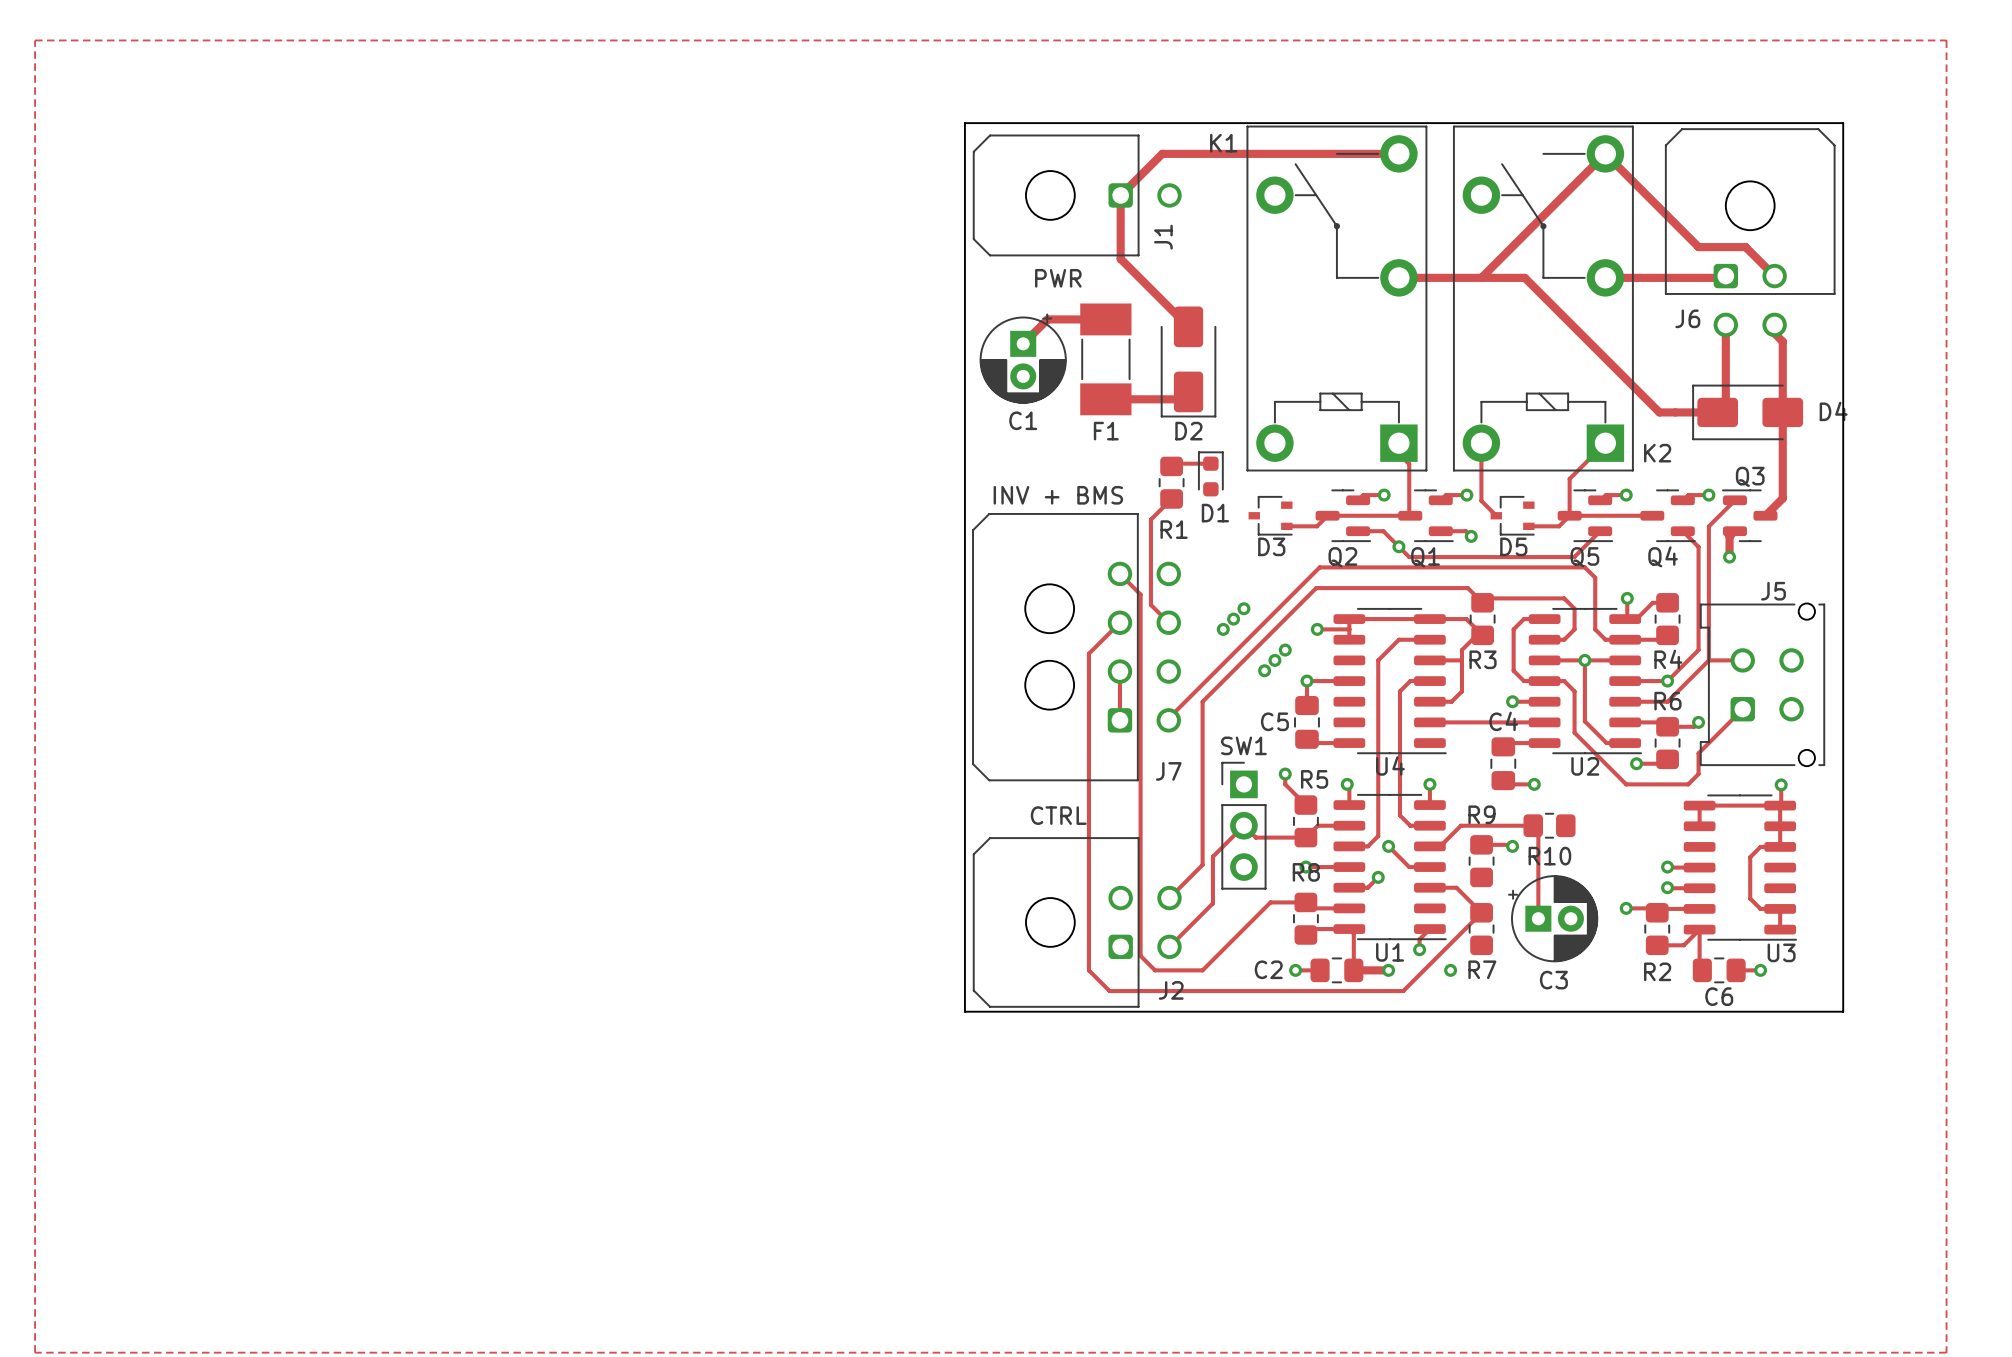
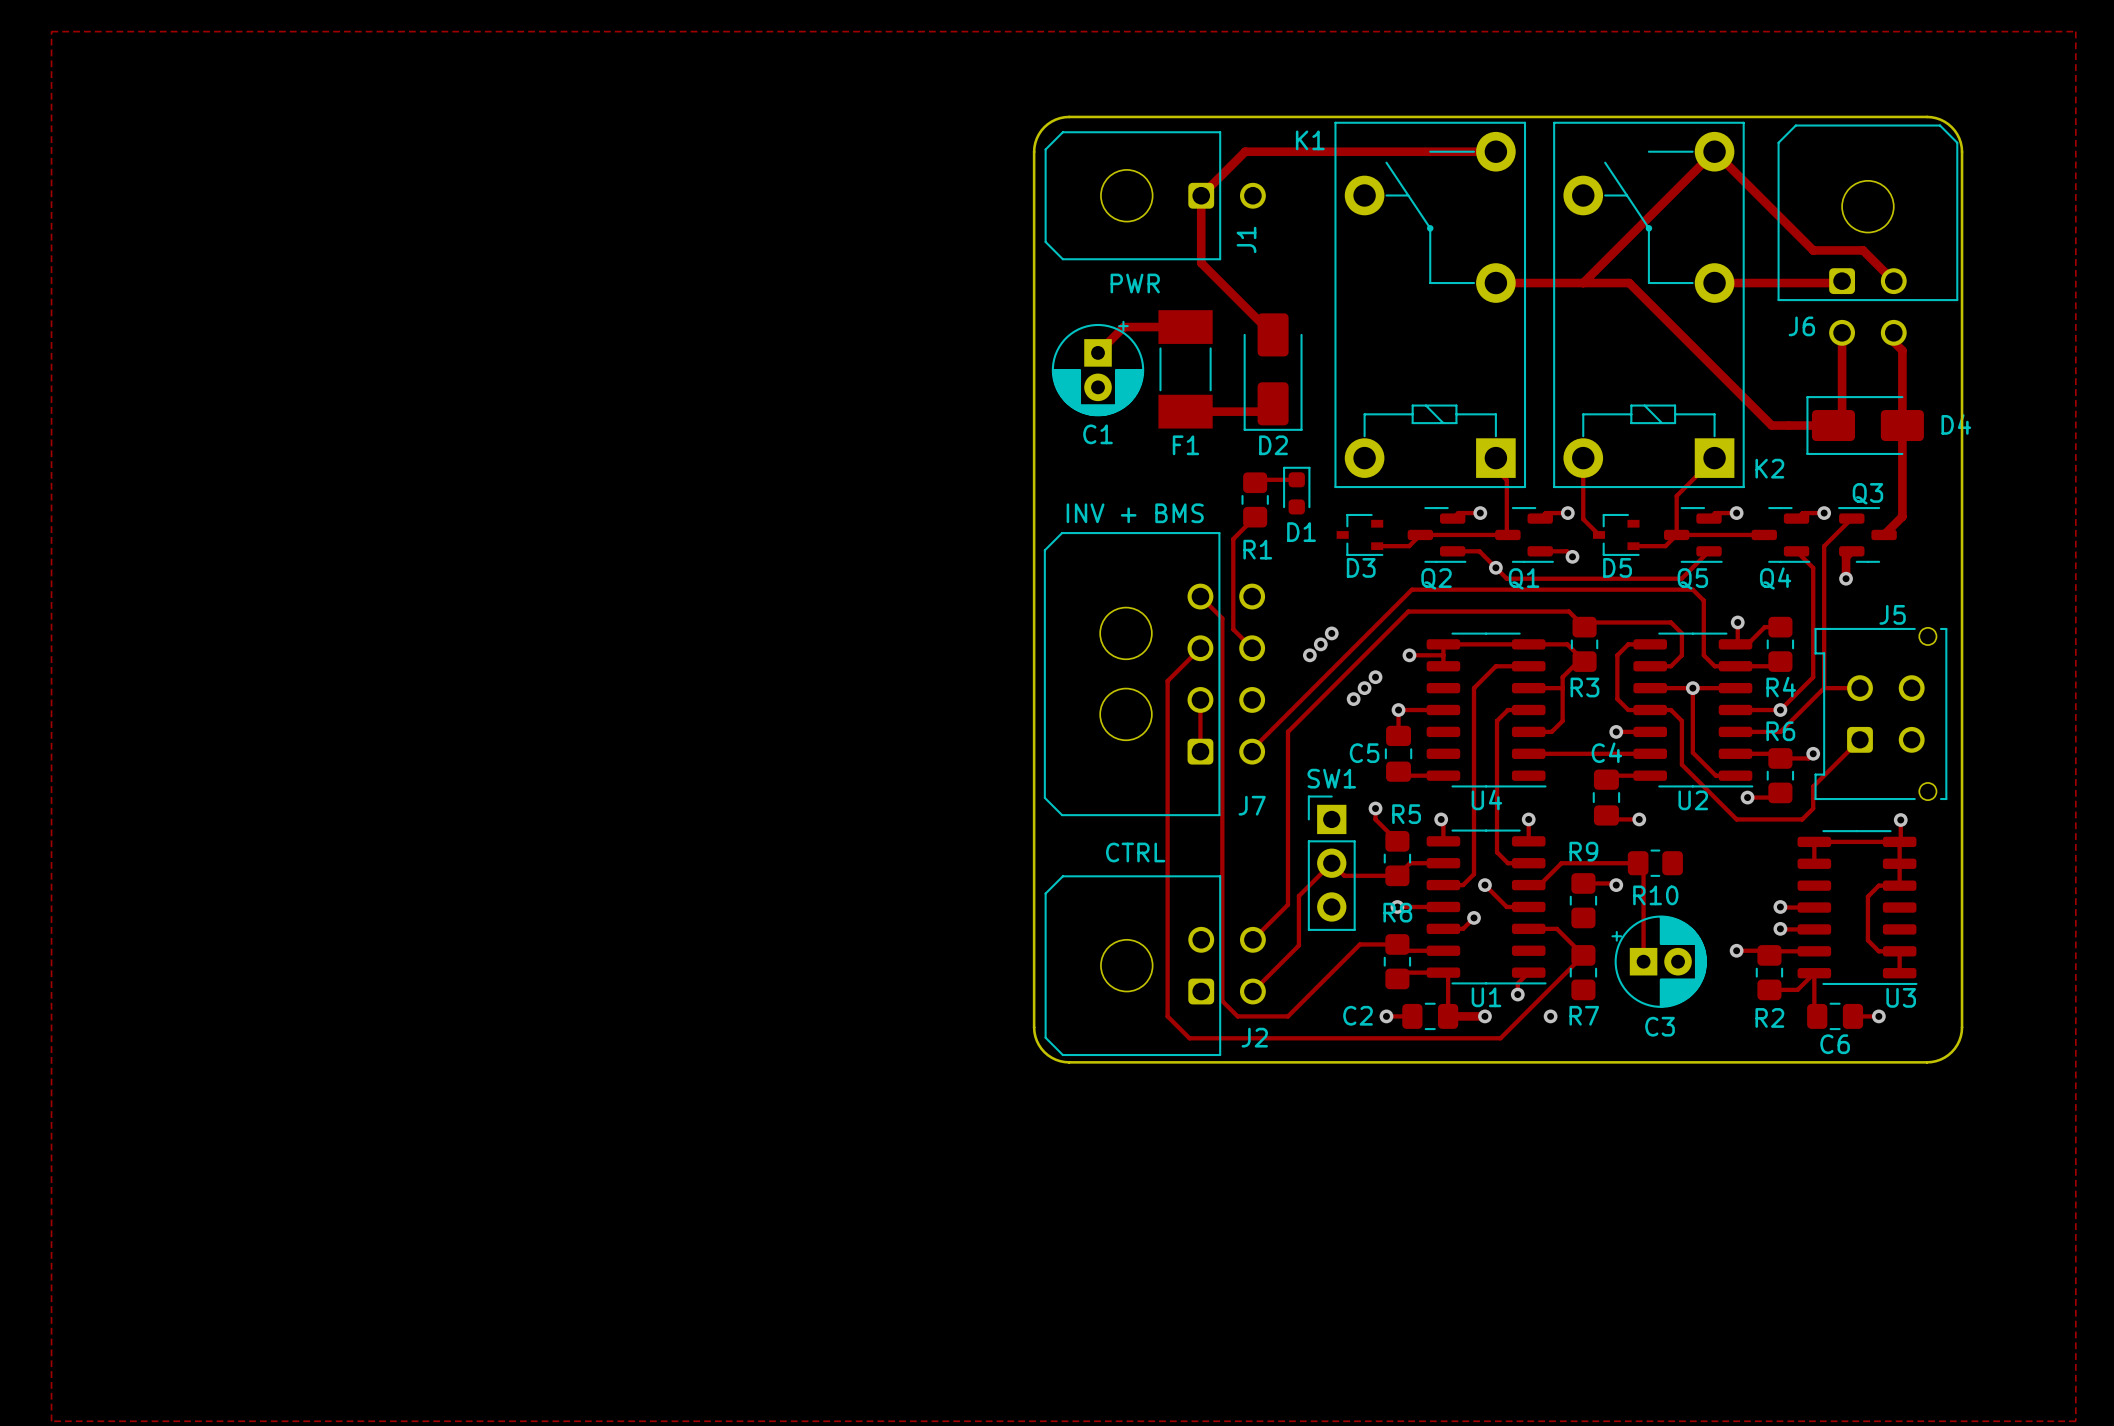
board edge: (964, 123) (1843, 123) (1843, 1011) (964, 1011) (964, 123) -> (1069, 116) (1055, 119) (1044, 127) (1036, 138) (1034, 151) (1034, 1027) (1036, 1040) (1044, 1052) (1055, 1059) (1069, 1062) (1927, 1062) (1940, 1059) (1951, 1052) (1959, 1040) (1962, 1027) (1962, 151) (1959, 138) (1951, 127) (1940, 119) (1927, 116) (1069, 116)

